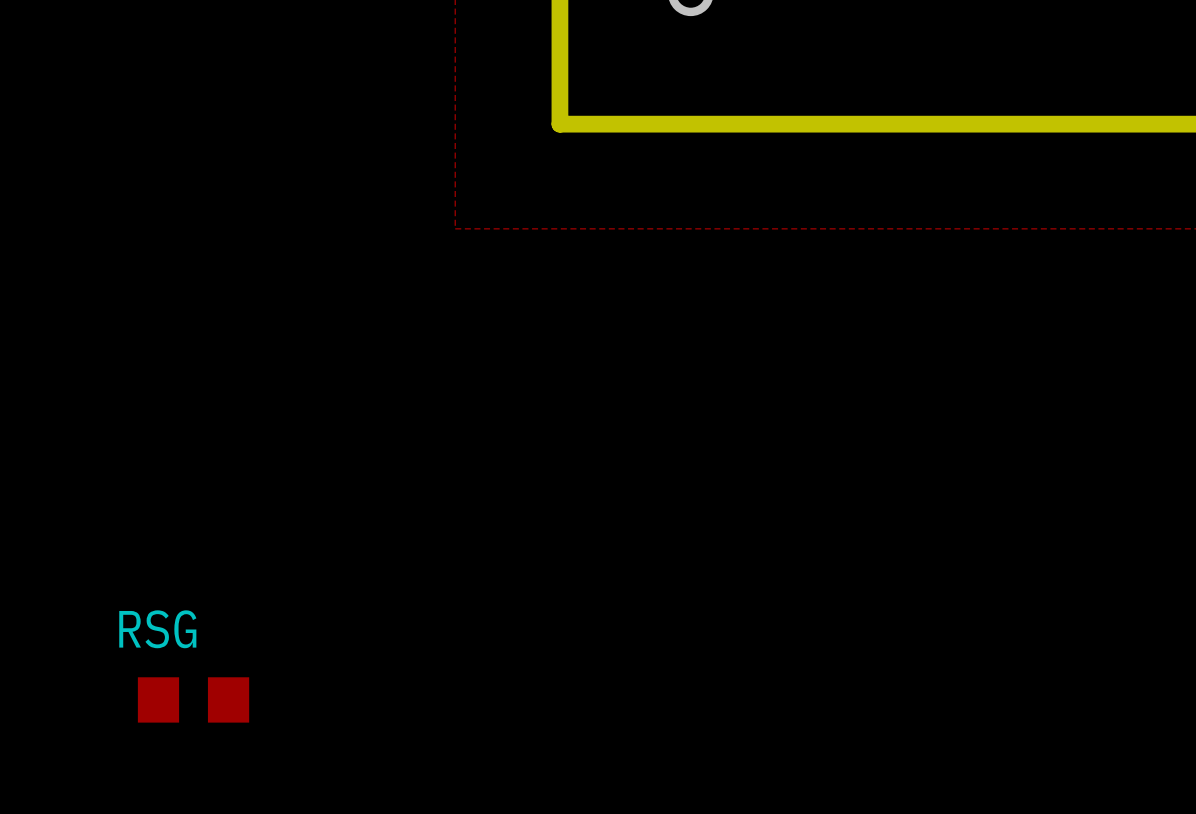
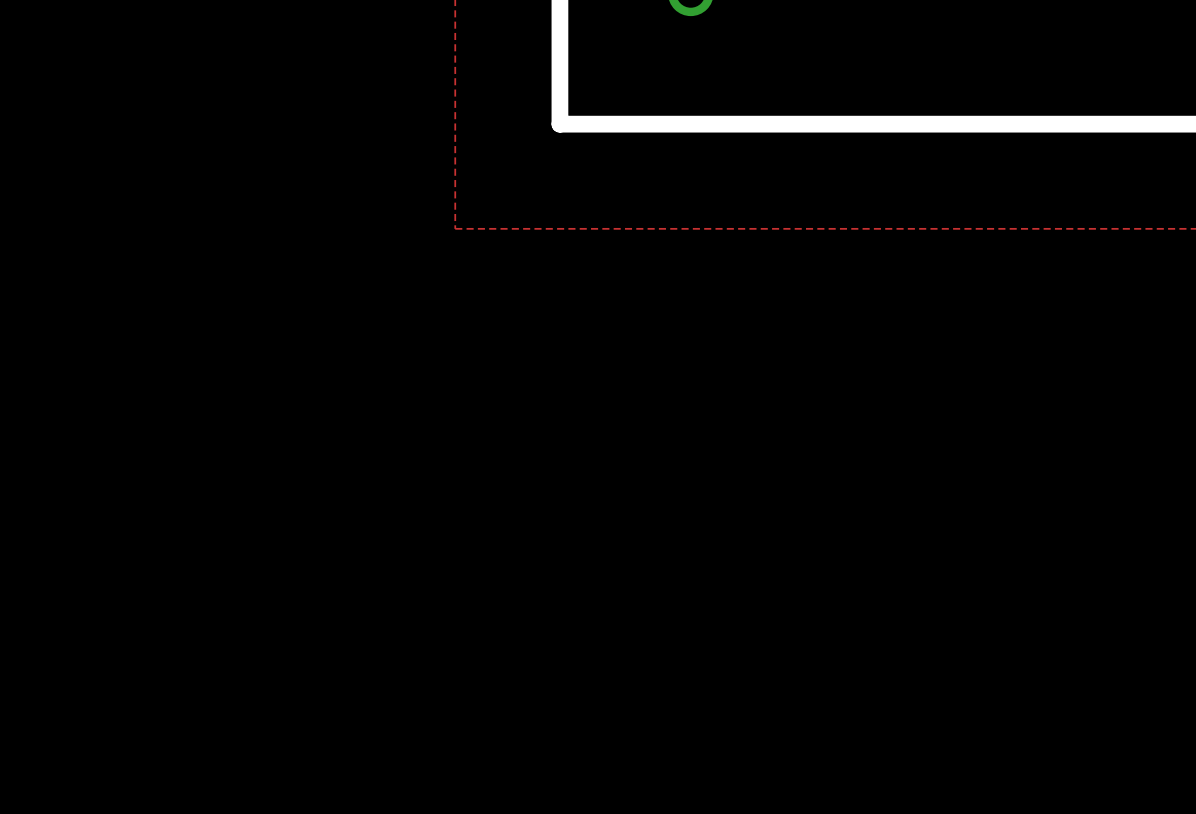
RSG: (193, 699) -> none

